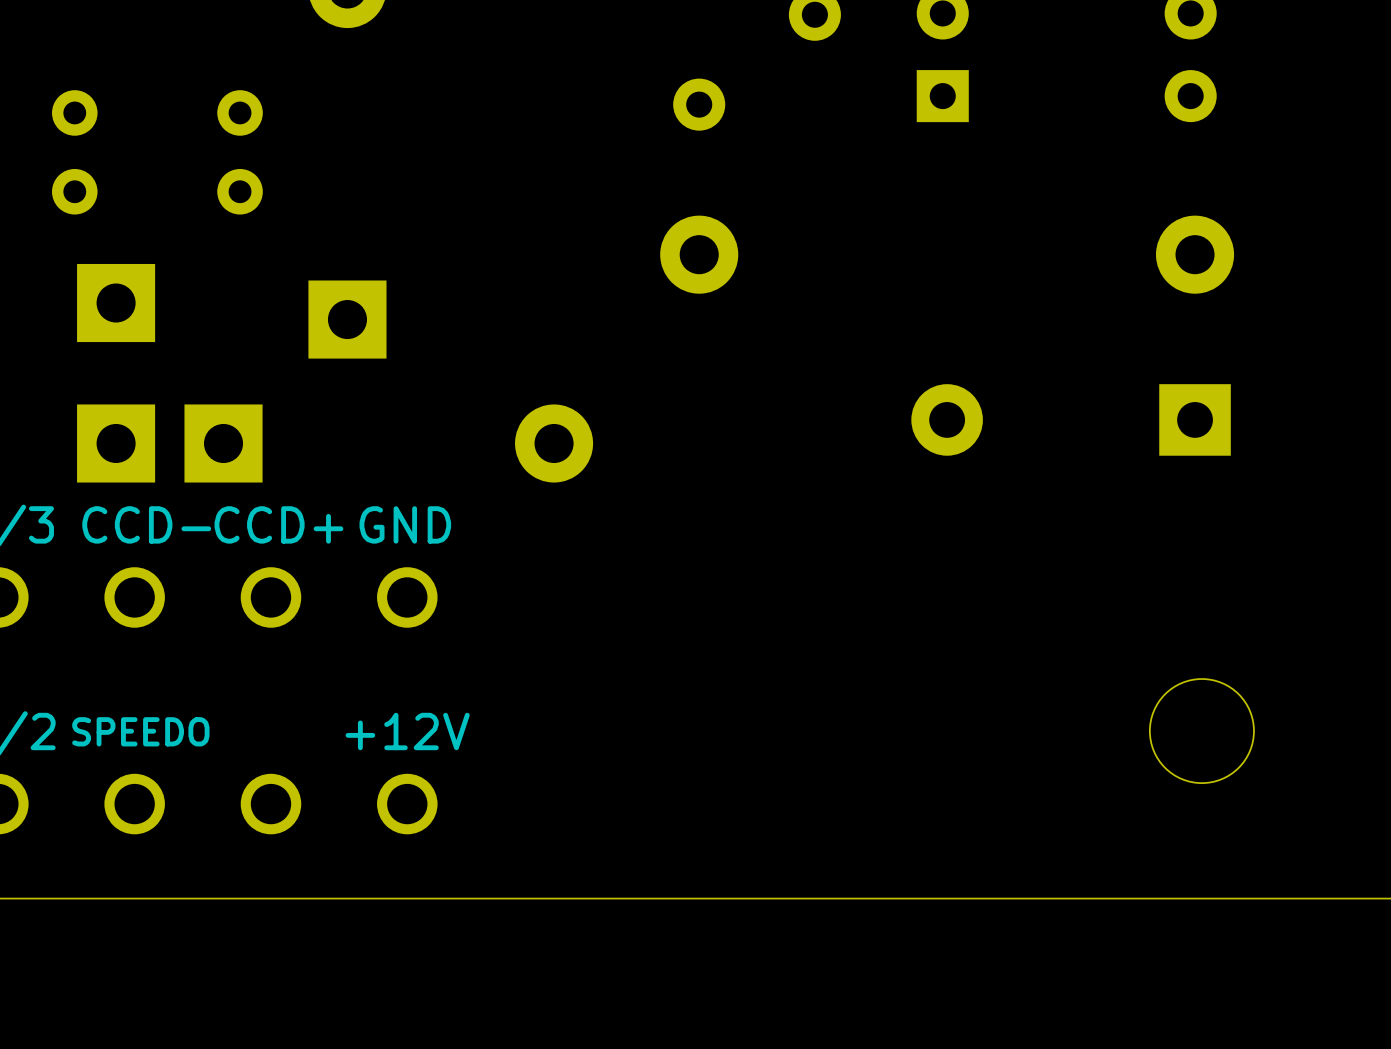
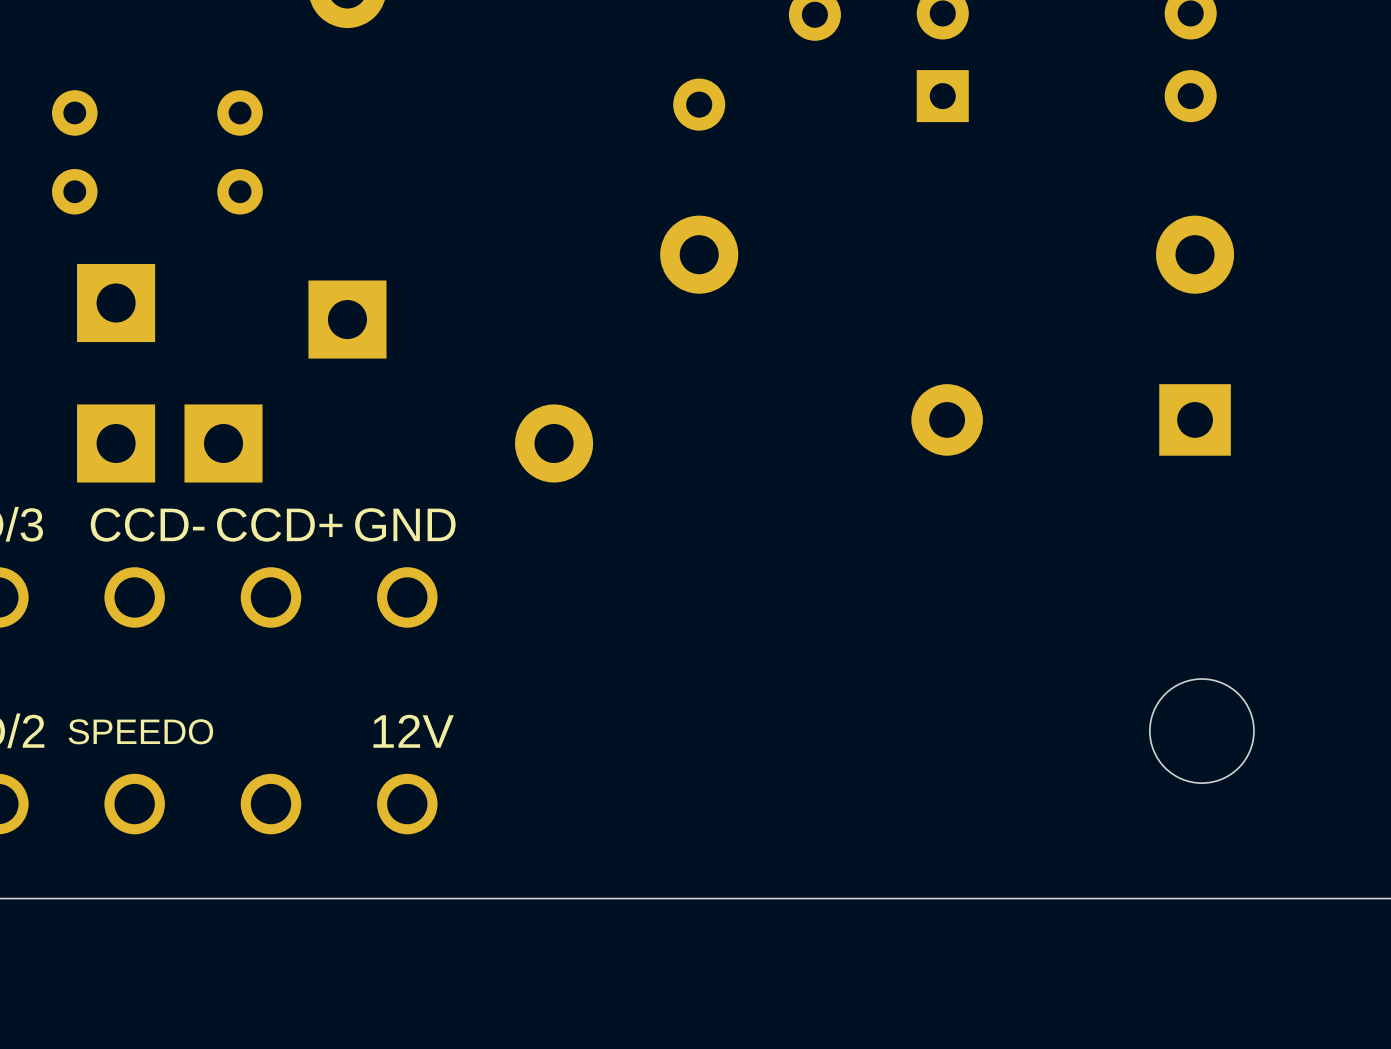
text: +12V (407, 731) -> 12V (413, 731)

